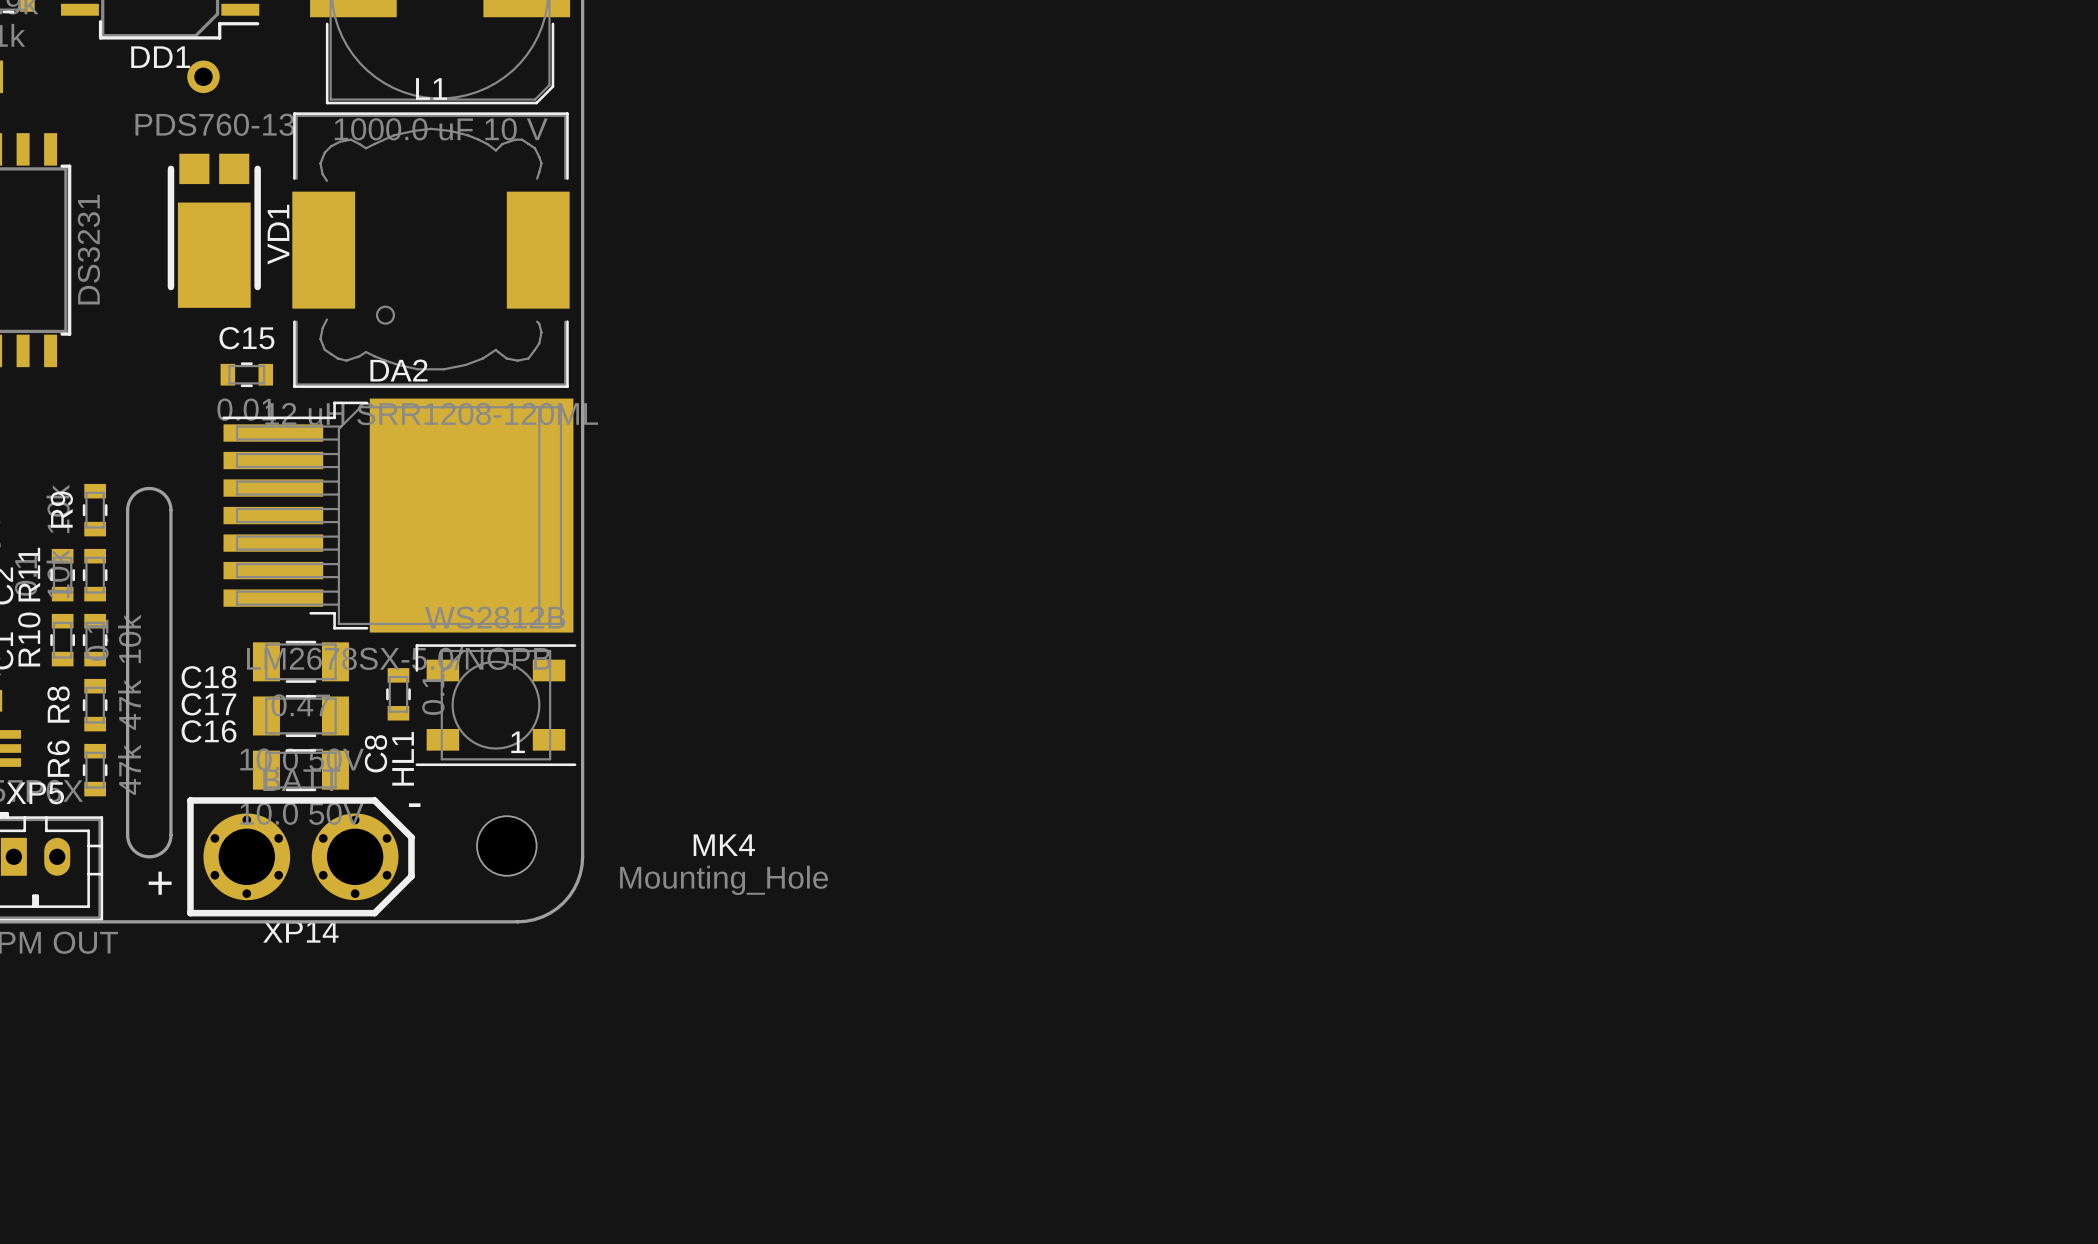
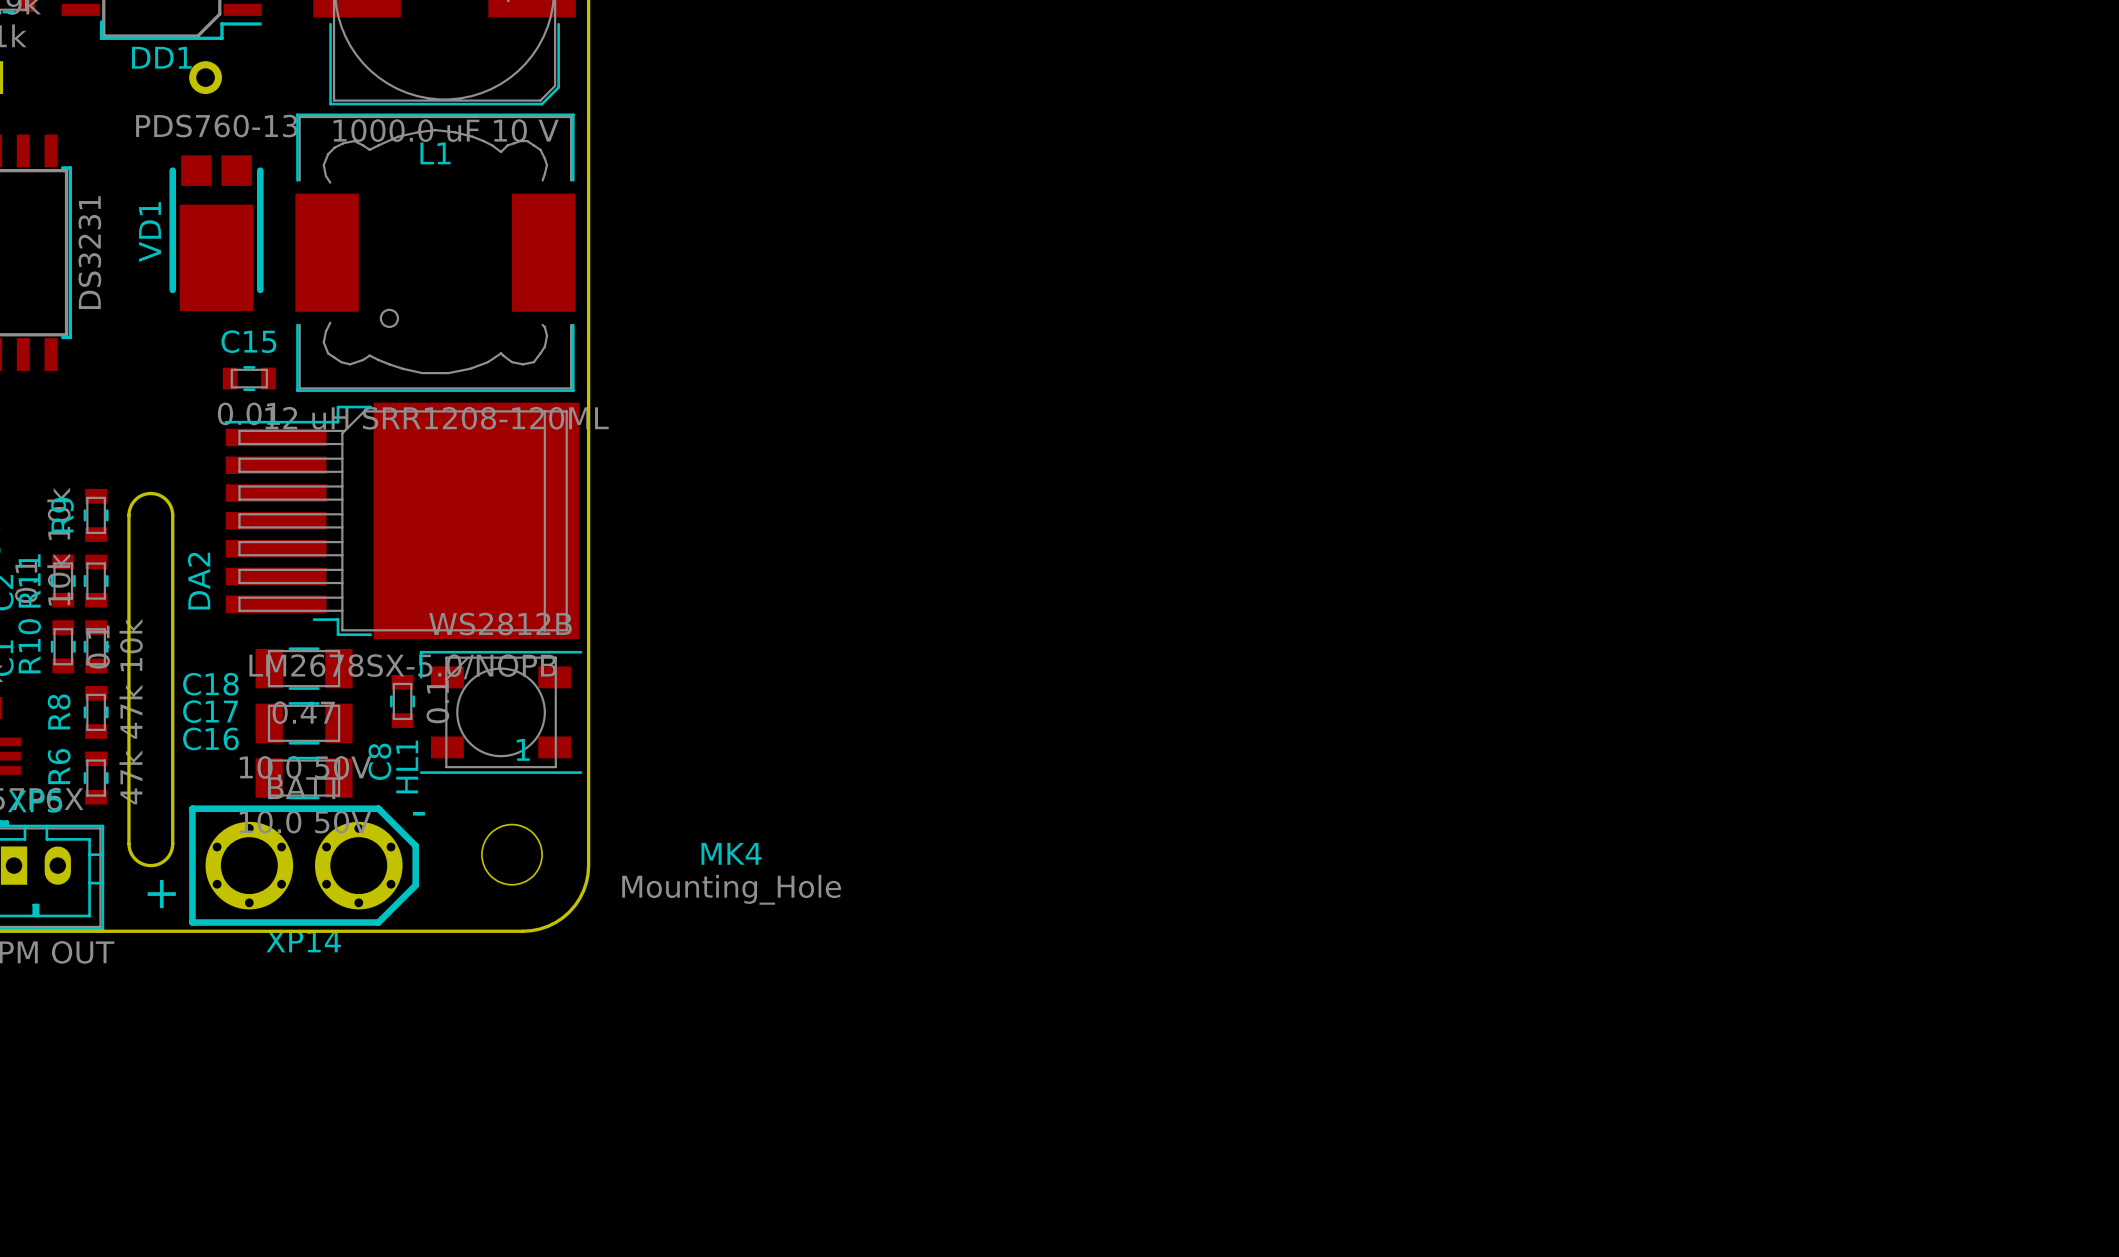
L1 name position: L1 (431, 89) -> L1 (435, 153)
VD1 name position: VD1 (278, 234) -> VD1 (150, 232)
DA2 name rotation: 0° (398, 370) -> 90° counterclockwise (199, 581)
DA2 name position: DA2 (398, 370) -> DA2 (199, 581)

